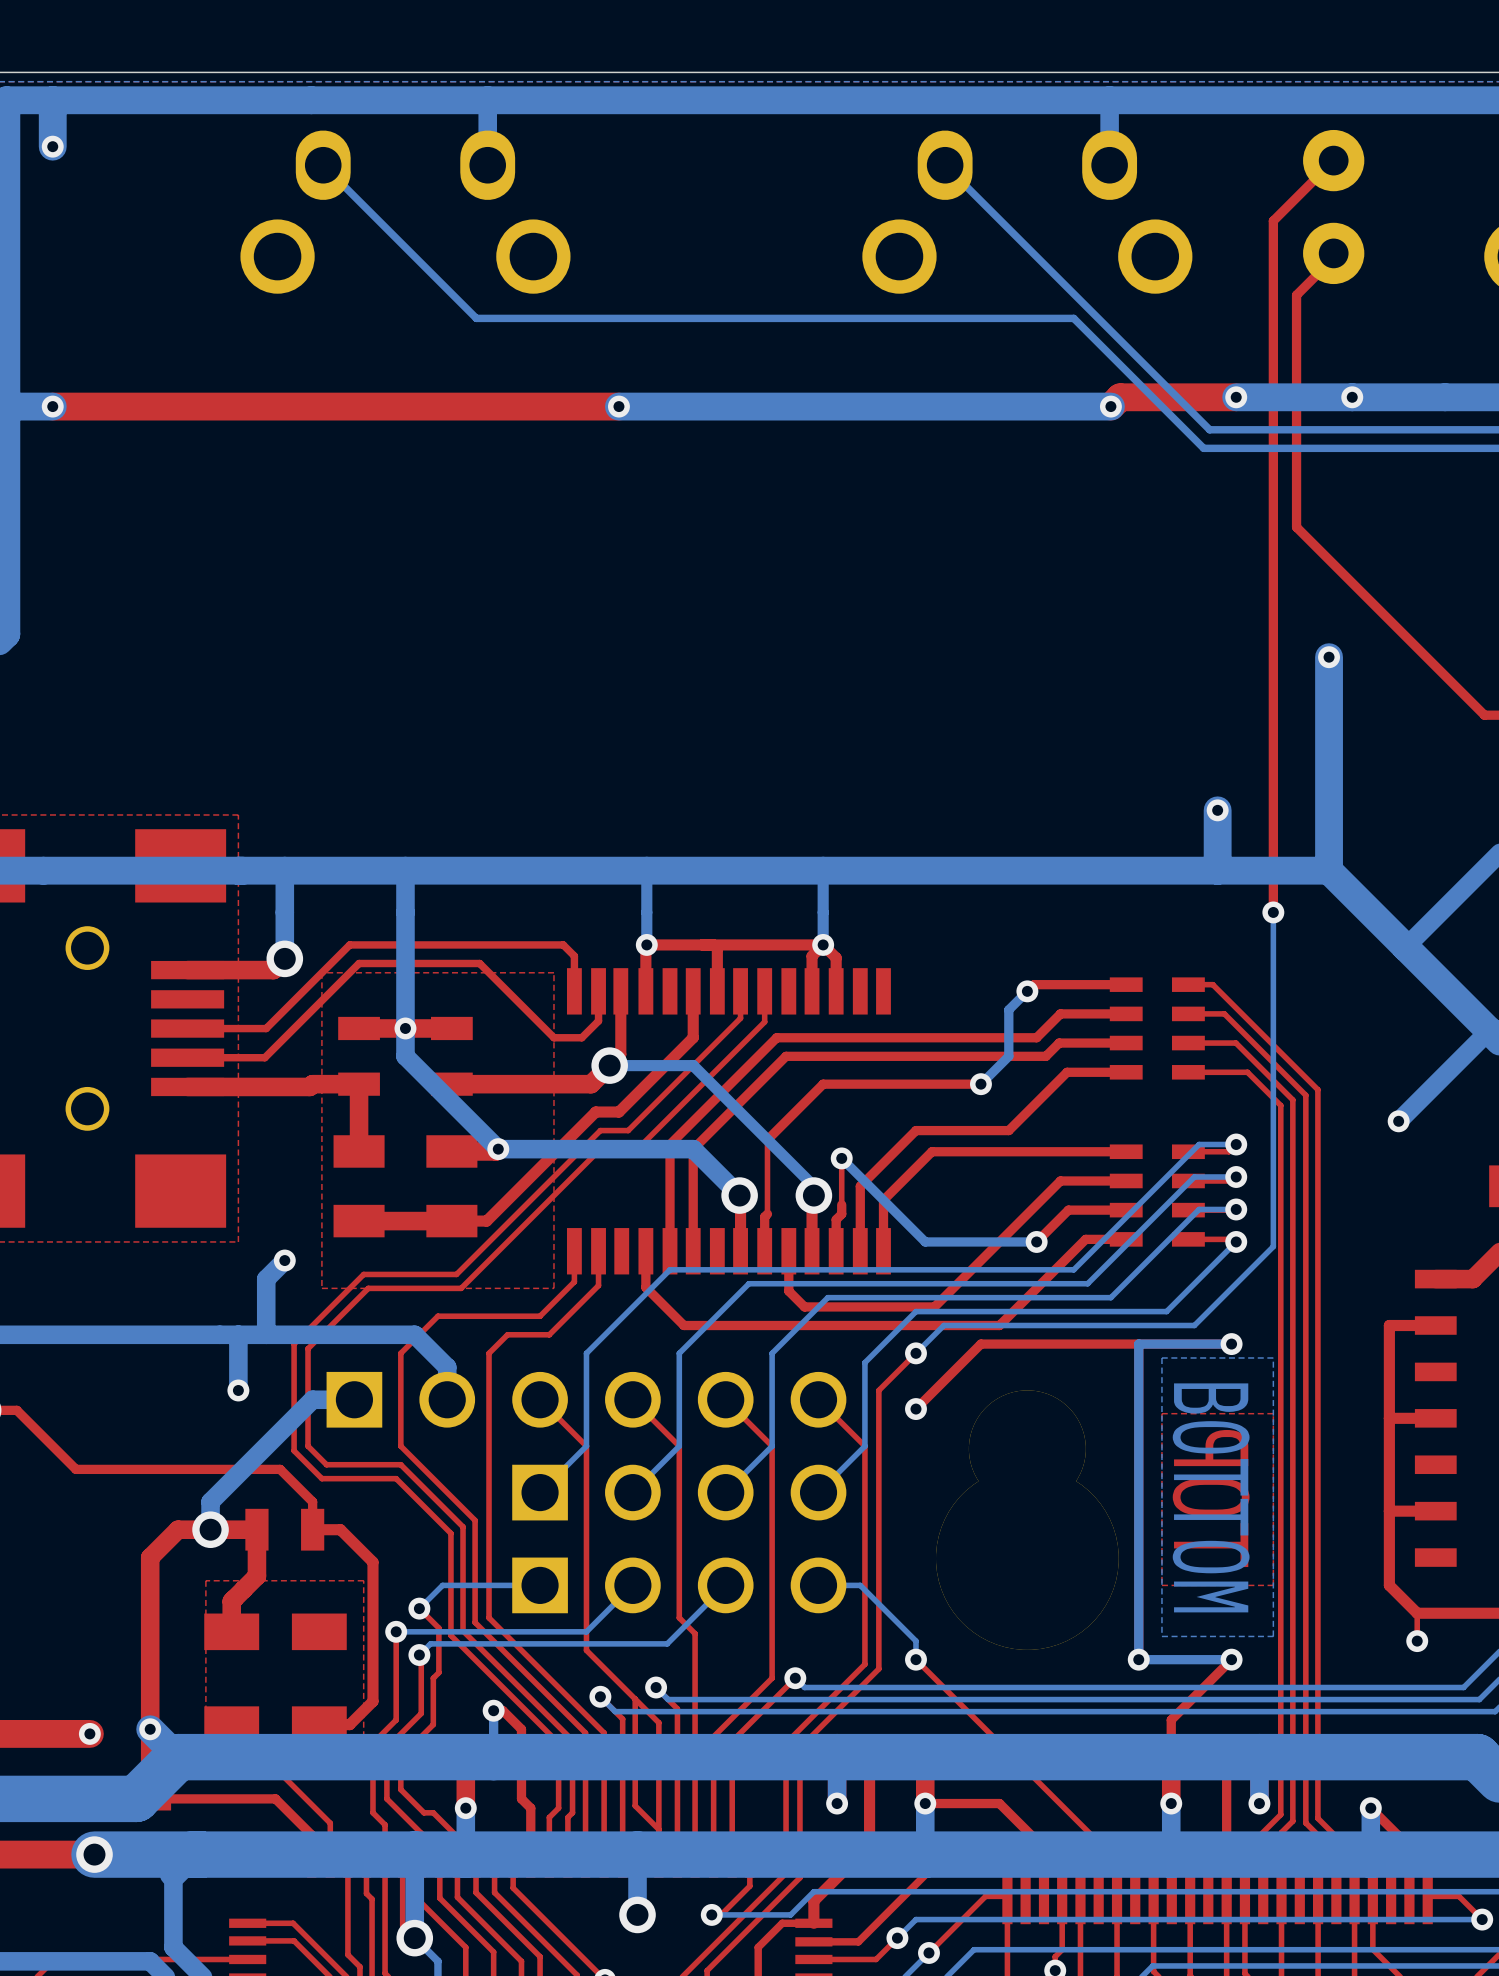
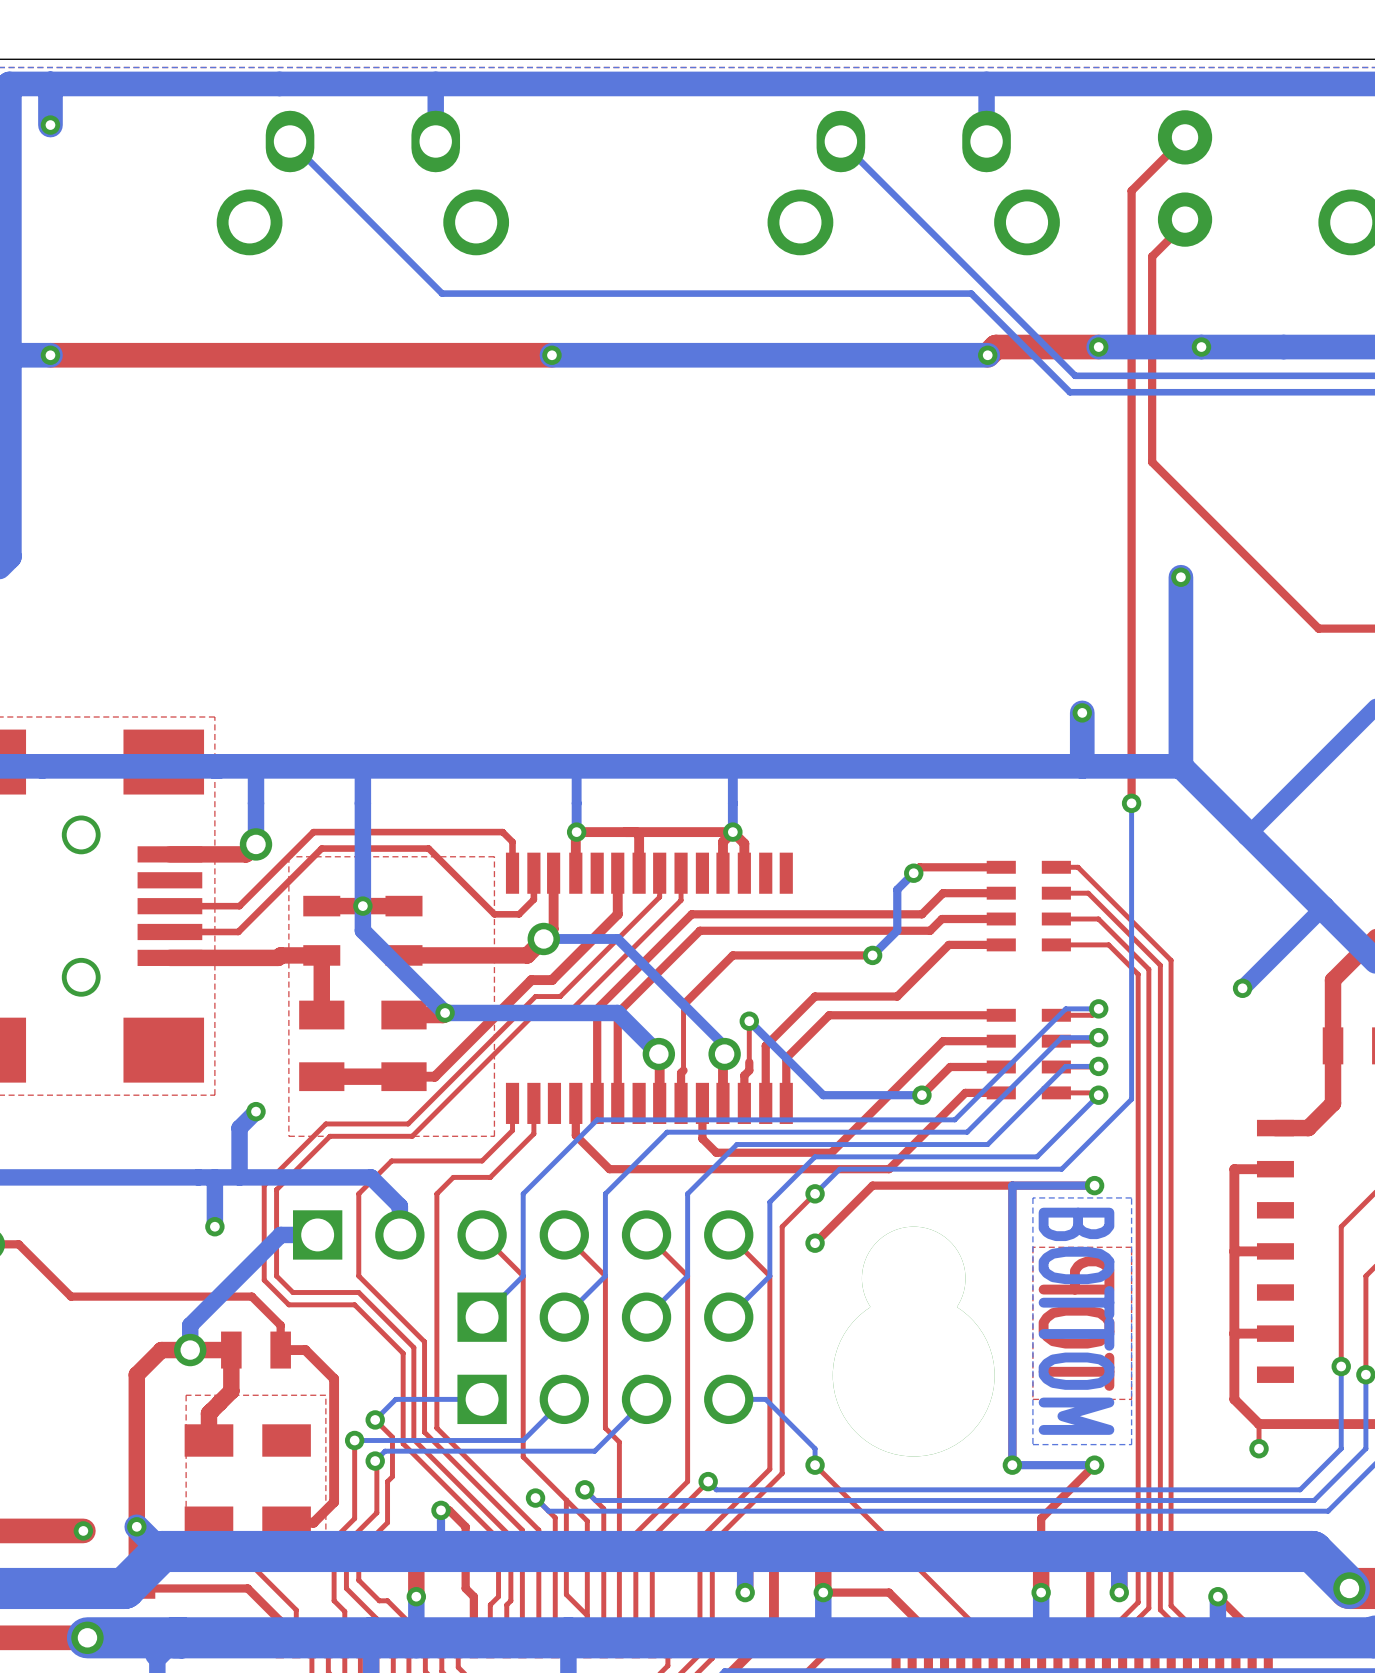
bottom track: (476, 318) (1073, 318) (1092, 336) -> (425, 277) (442, 293) (971, 293)

